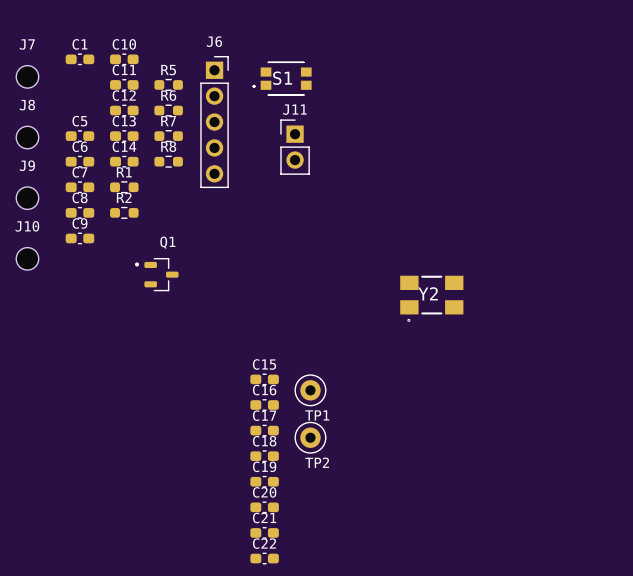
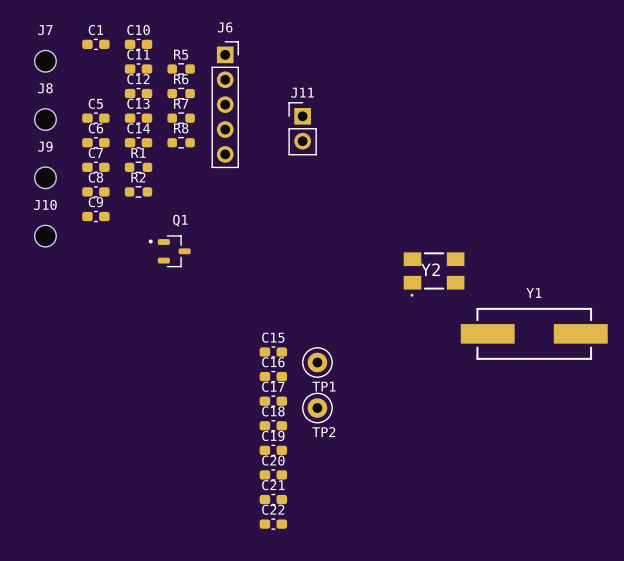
S1: (282, 78) -> none
Y1: none -> (534, 333)

